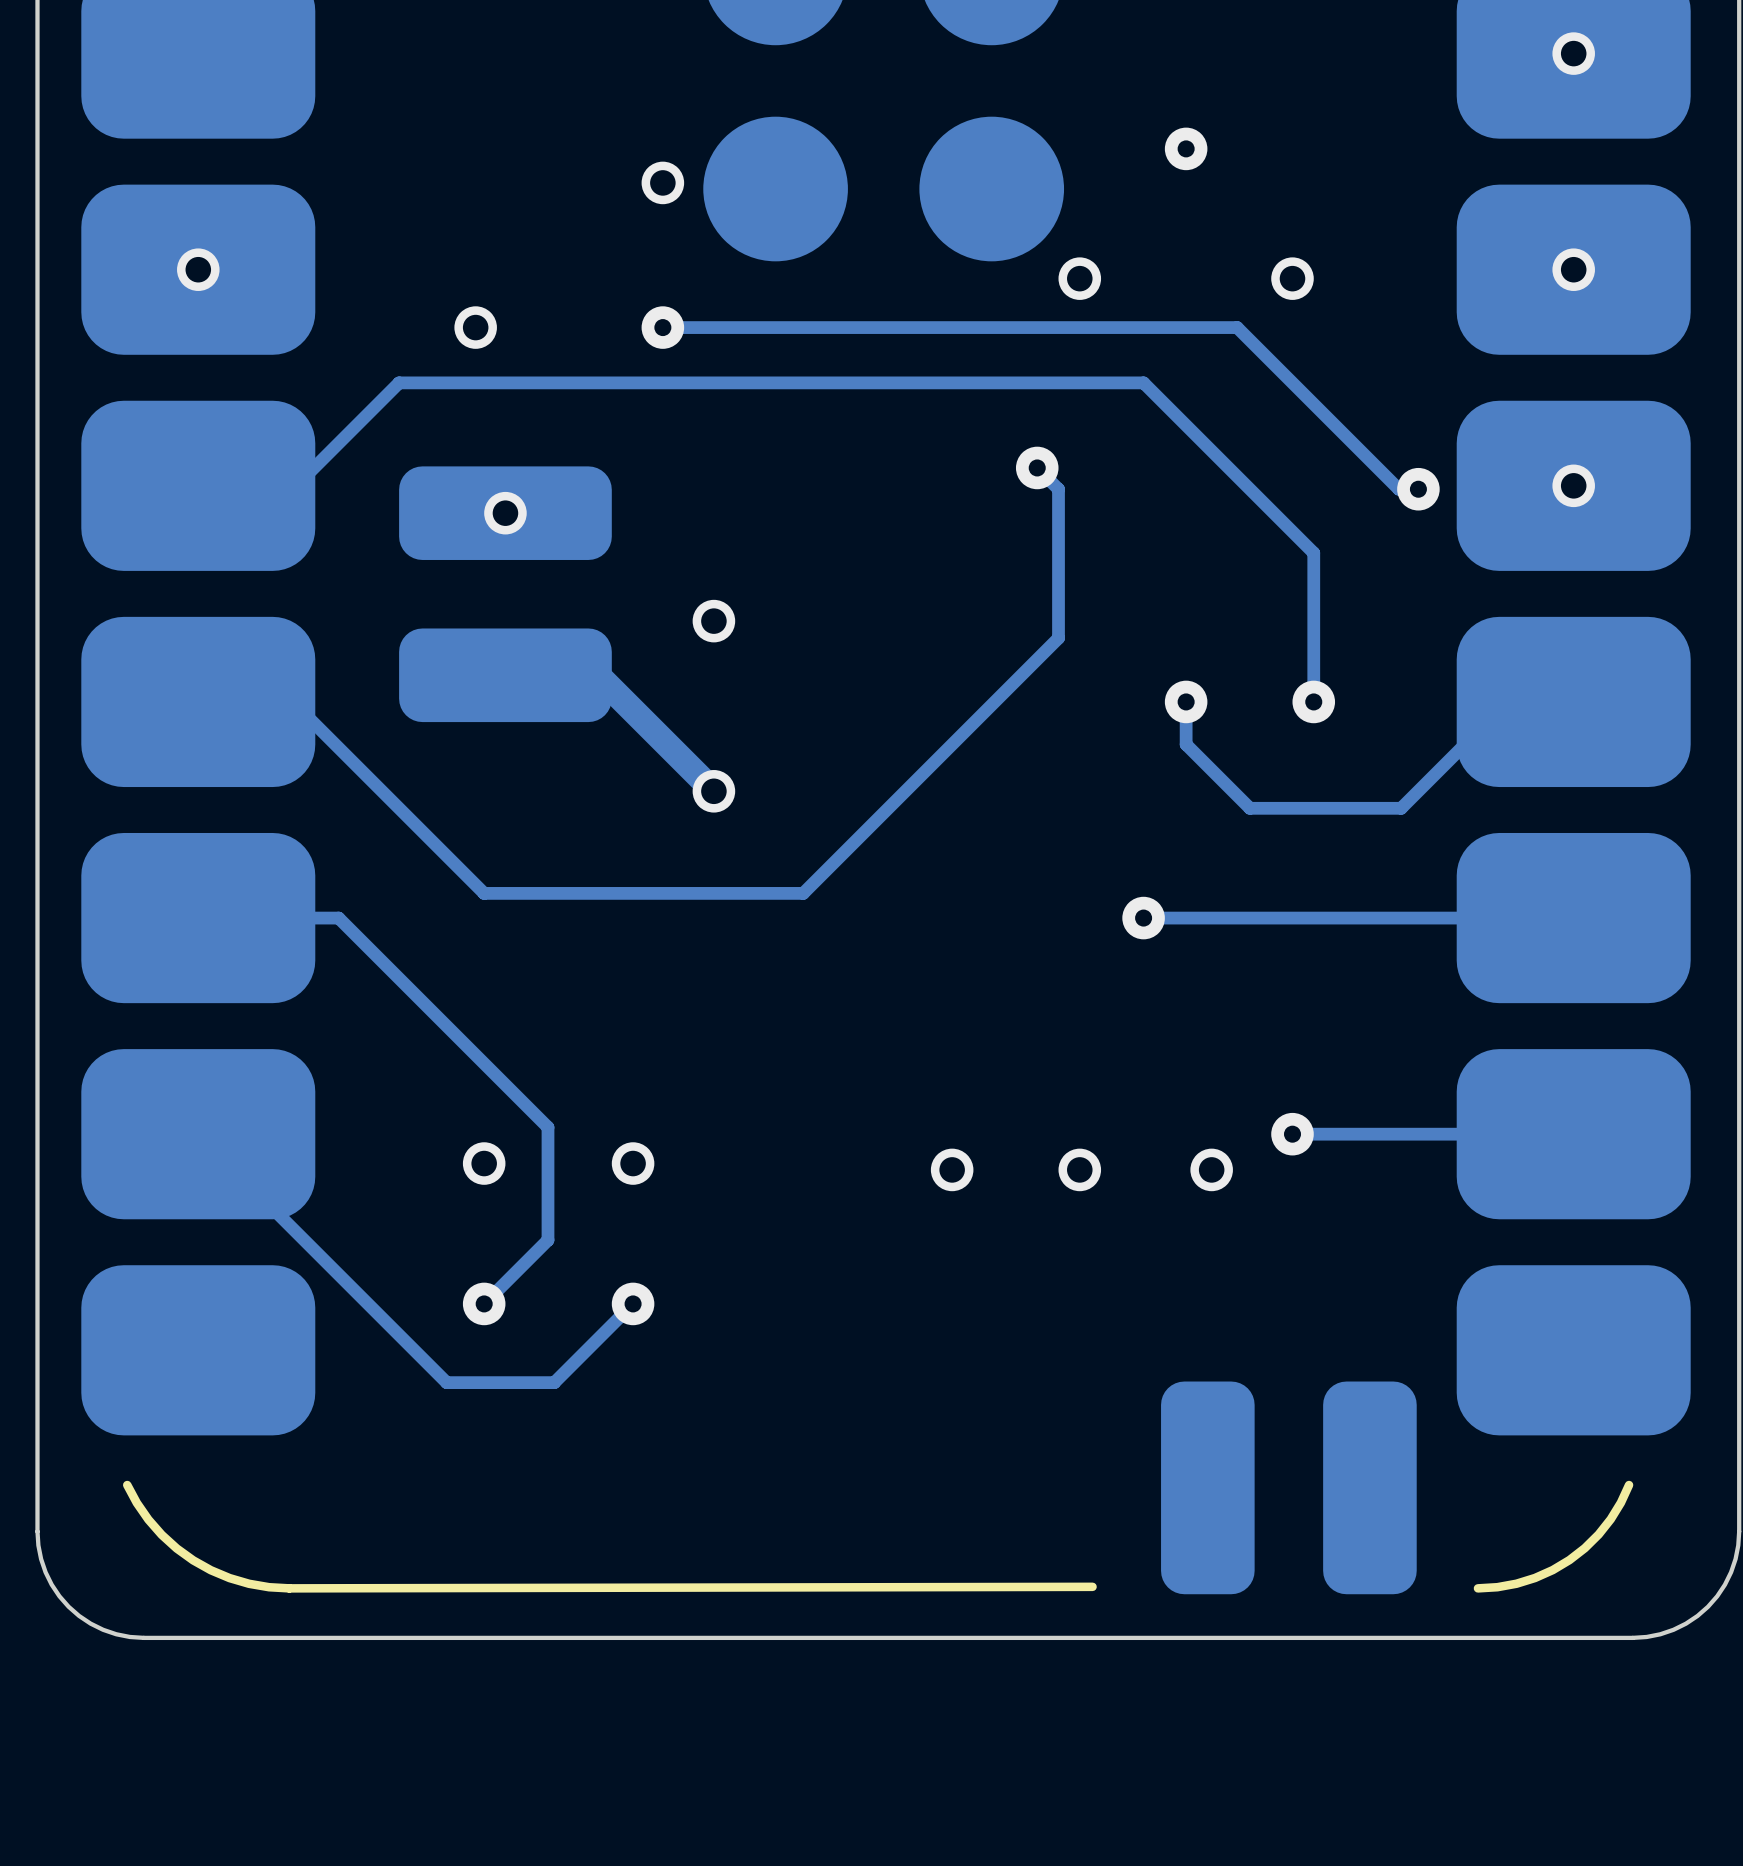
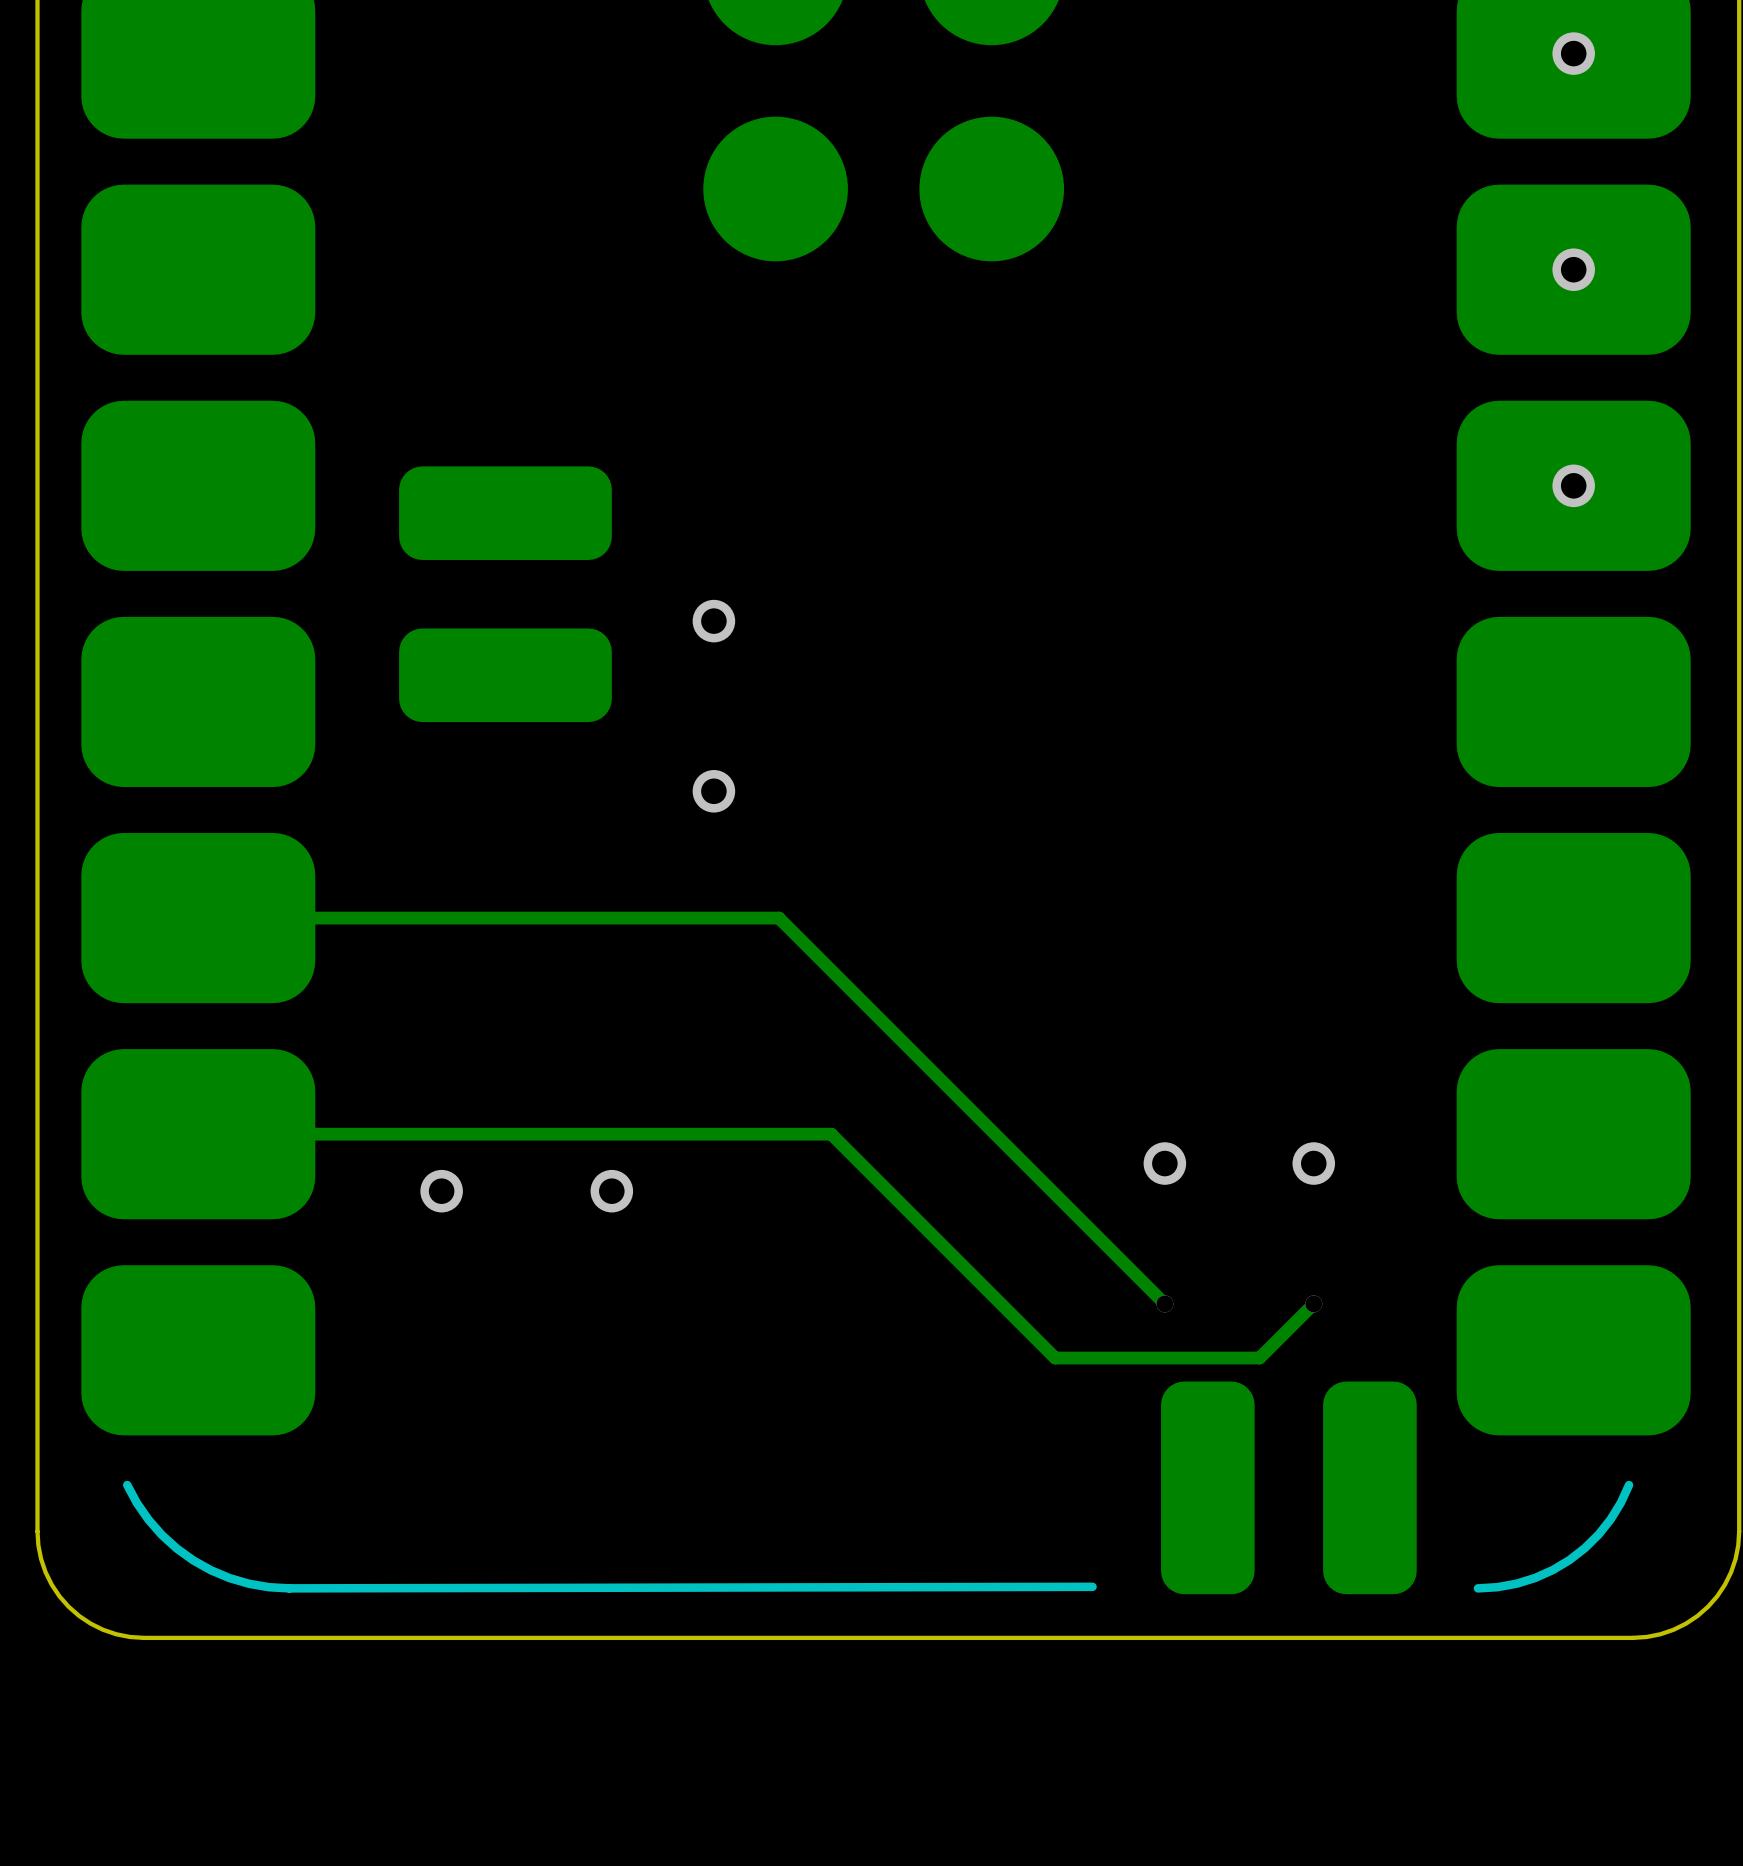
via: (1186, 148) -> none
via: (662, 182) -> none
via: (198, 269) -> none
via: (1079, 278) -> none
via: (1292, 278) -> none
via: (475, 327) -> none
track: (662, 327) (1237, 327) (1398, 489) (1418, 489) -> none
via: (662, 327) -> none
track: (1037, 467) (1058, 489) (1058, 638) (803, 893) (484, 893) (292, 701) (198, 701) -> none
via: (1037, 467) -> none
track: (198, 485) (296, 485) (399, 382) (1143, 382) (1313, 553) (1313, 701) -> none
via: (1418, 489) -> none
via: (505, 513) -> none
track: (505, 675) (597, 675) (713, 791) -> none
via: (1186, 701) -> none
via: (1313, 701) -> none
track: (1573, 701) (1507, 701) (1401, 808) (1249, 808) (1186, 744) (1186, 701) -> none
track: (338, 918) (547, 1127) (547, 1240) (484, 1303) (484, 1297) -> (338, 918) (779, 918) (1164, 1303)
via: (1143, 918) -> none
track: (1573, 918) (1143, 918) -> none
track: (216, 1116) (198, 1134) (446, 1382) (554, 1382) (633, 1303) -> none
track: none -> (198, 1134) (831, 1134) (1055, 1358) (1259, 1358) (1313, 1303)
via position: (1292, 1134) -> (1313, 1163)
track: (1573, 1134) (1292, 1134) -> none
via position: (484, 1163) -> (441, 1191)
via position: (633, 1163) -> (611, 1191)
via: none -> (1164, 1163)
via: (952, 1169) -> none
via: (1079, 1169) -> none
via: (1211, 1169) -> none
via: (484, 1303) -> none
via: (633, 1303) -> none
via: none -> (1164, 1303)
via: none -> (1313, 1303)

